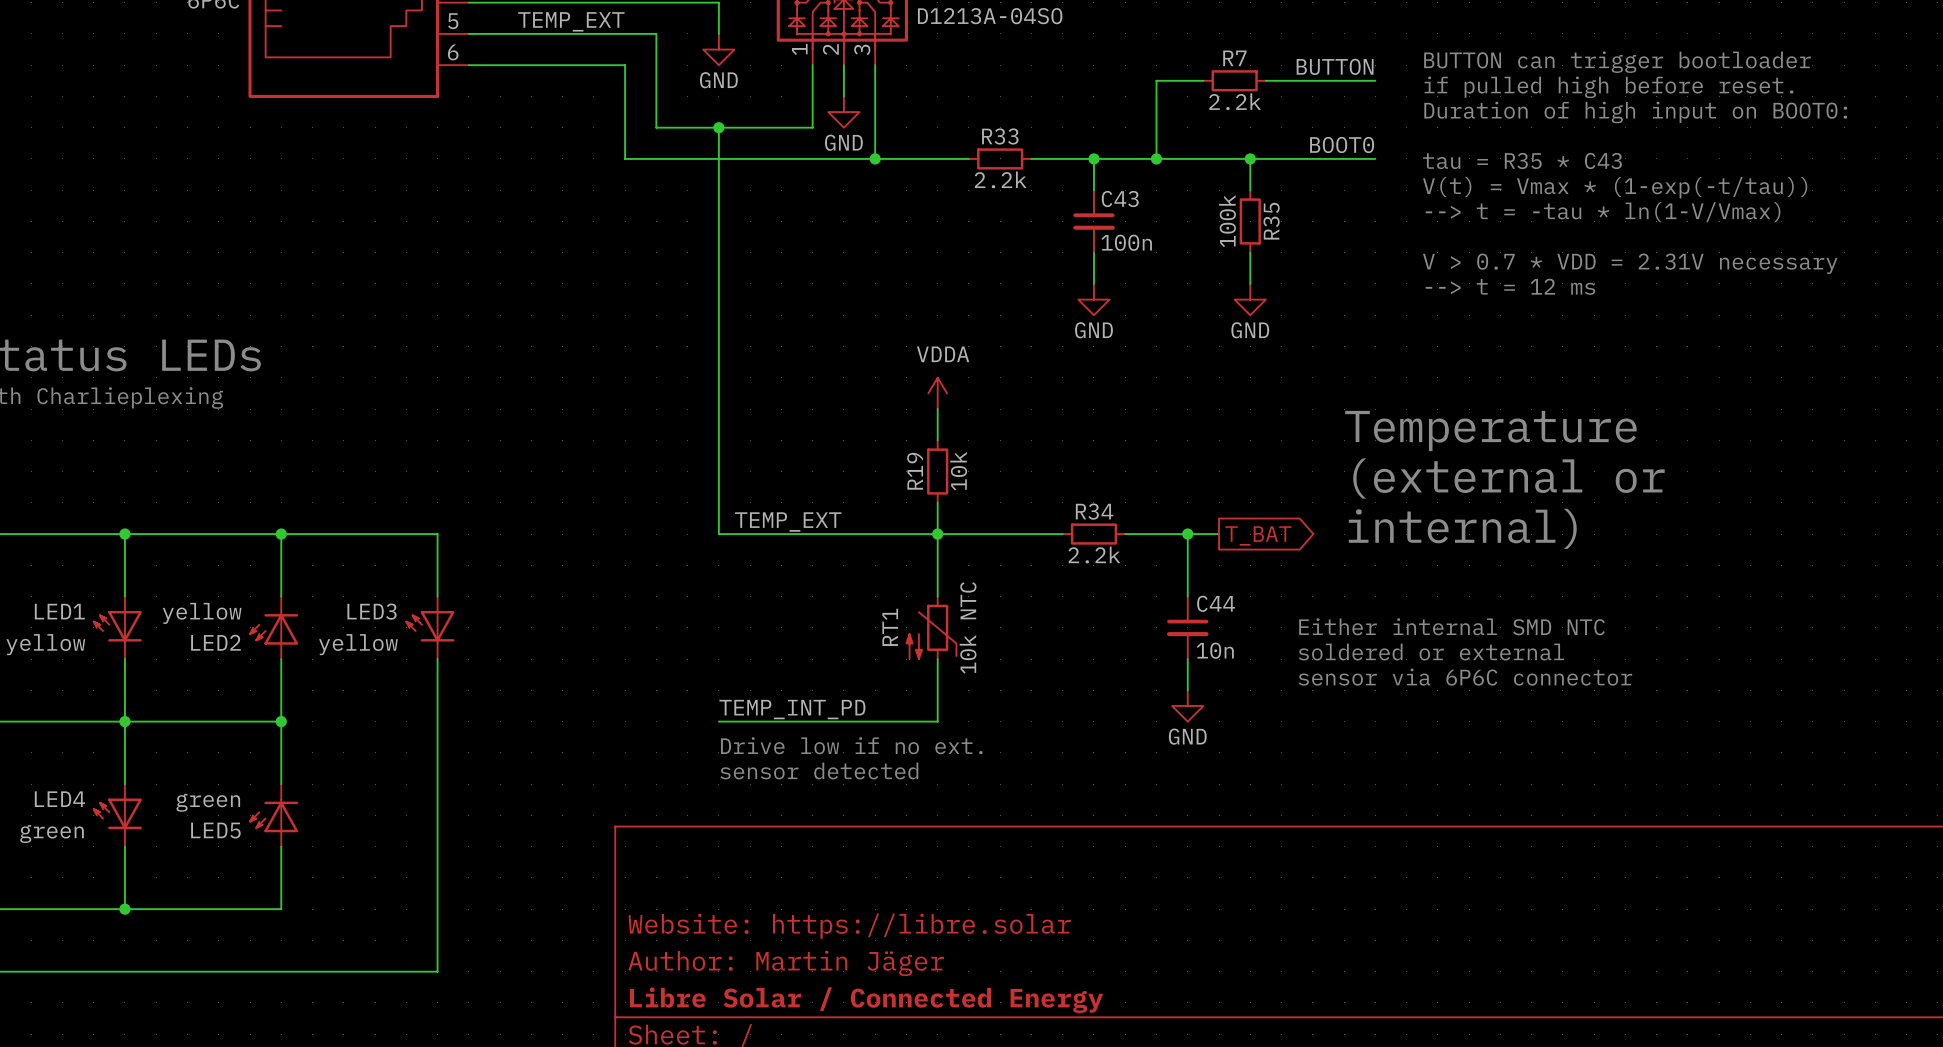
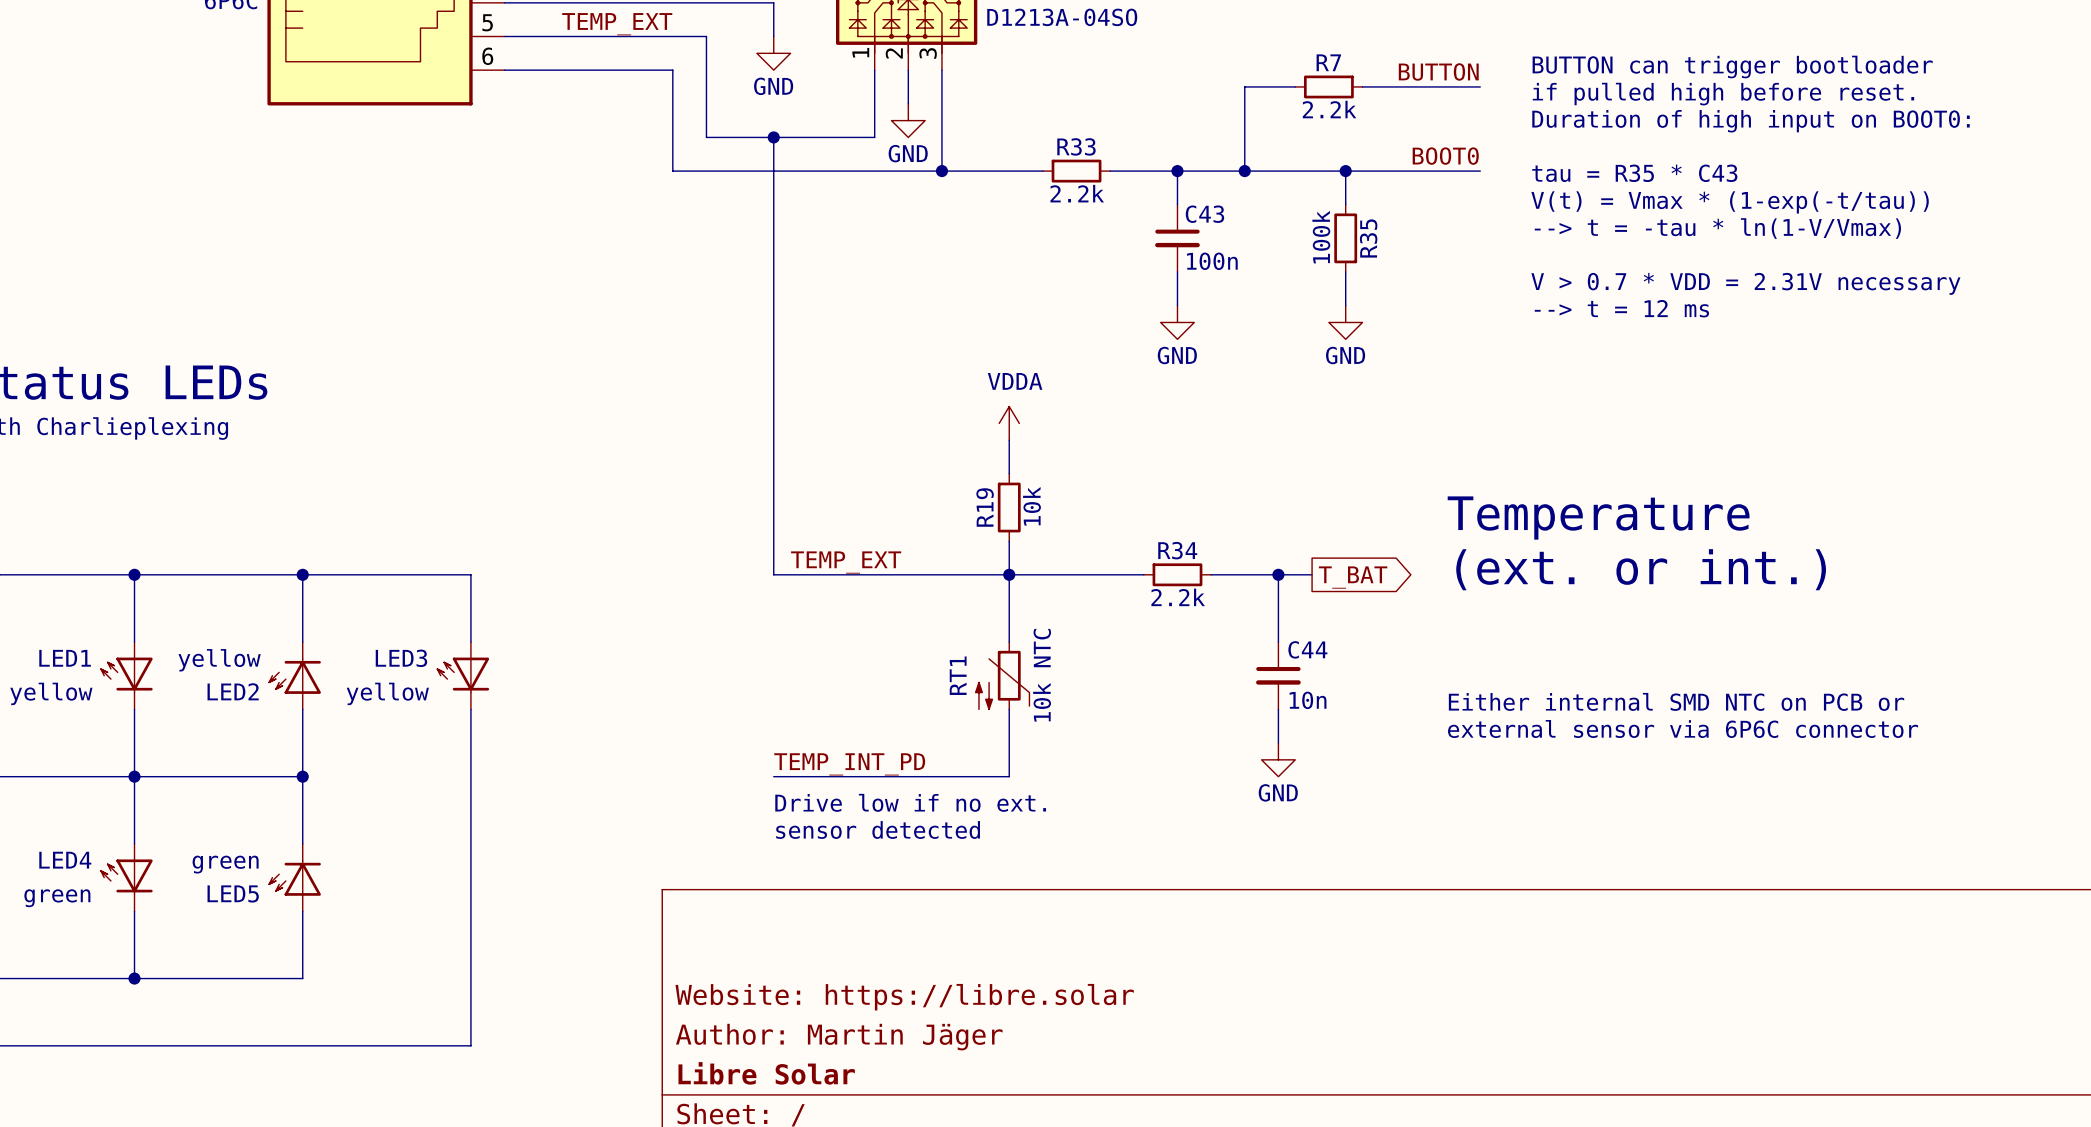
text: Temperature (1490, 430) -> none
text: (external or (1508, 478) -> Temperature (1598, 518)
text: internal) (1462, 528) -> (ext. or int.) (1641, 569)
text: Either internal SMD NTC (1451, 626) -> Either internal SMD NTC on PCB or (1676, 701)
text: soldered or external (1431, 652) -> none
text: sensor via 6P6C connector (1465, 677) -> external sensor via 6P6C connector (1683, 729)
title block: Libre Solar / Connected Energy (866, 1000) -> Libre Solar (766, 1073)

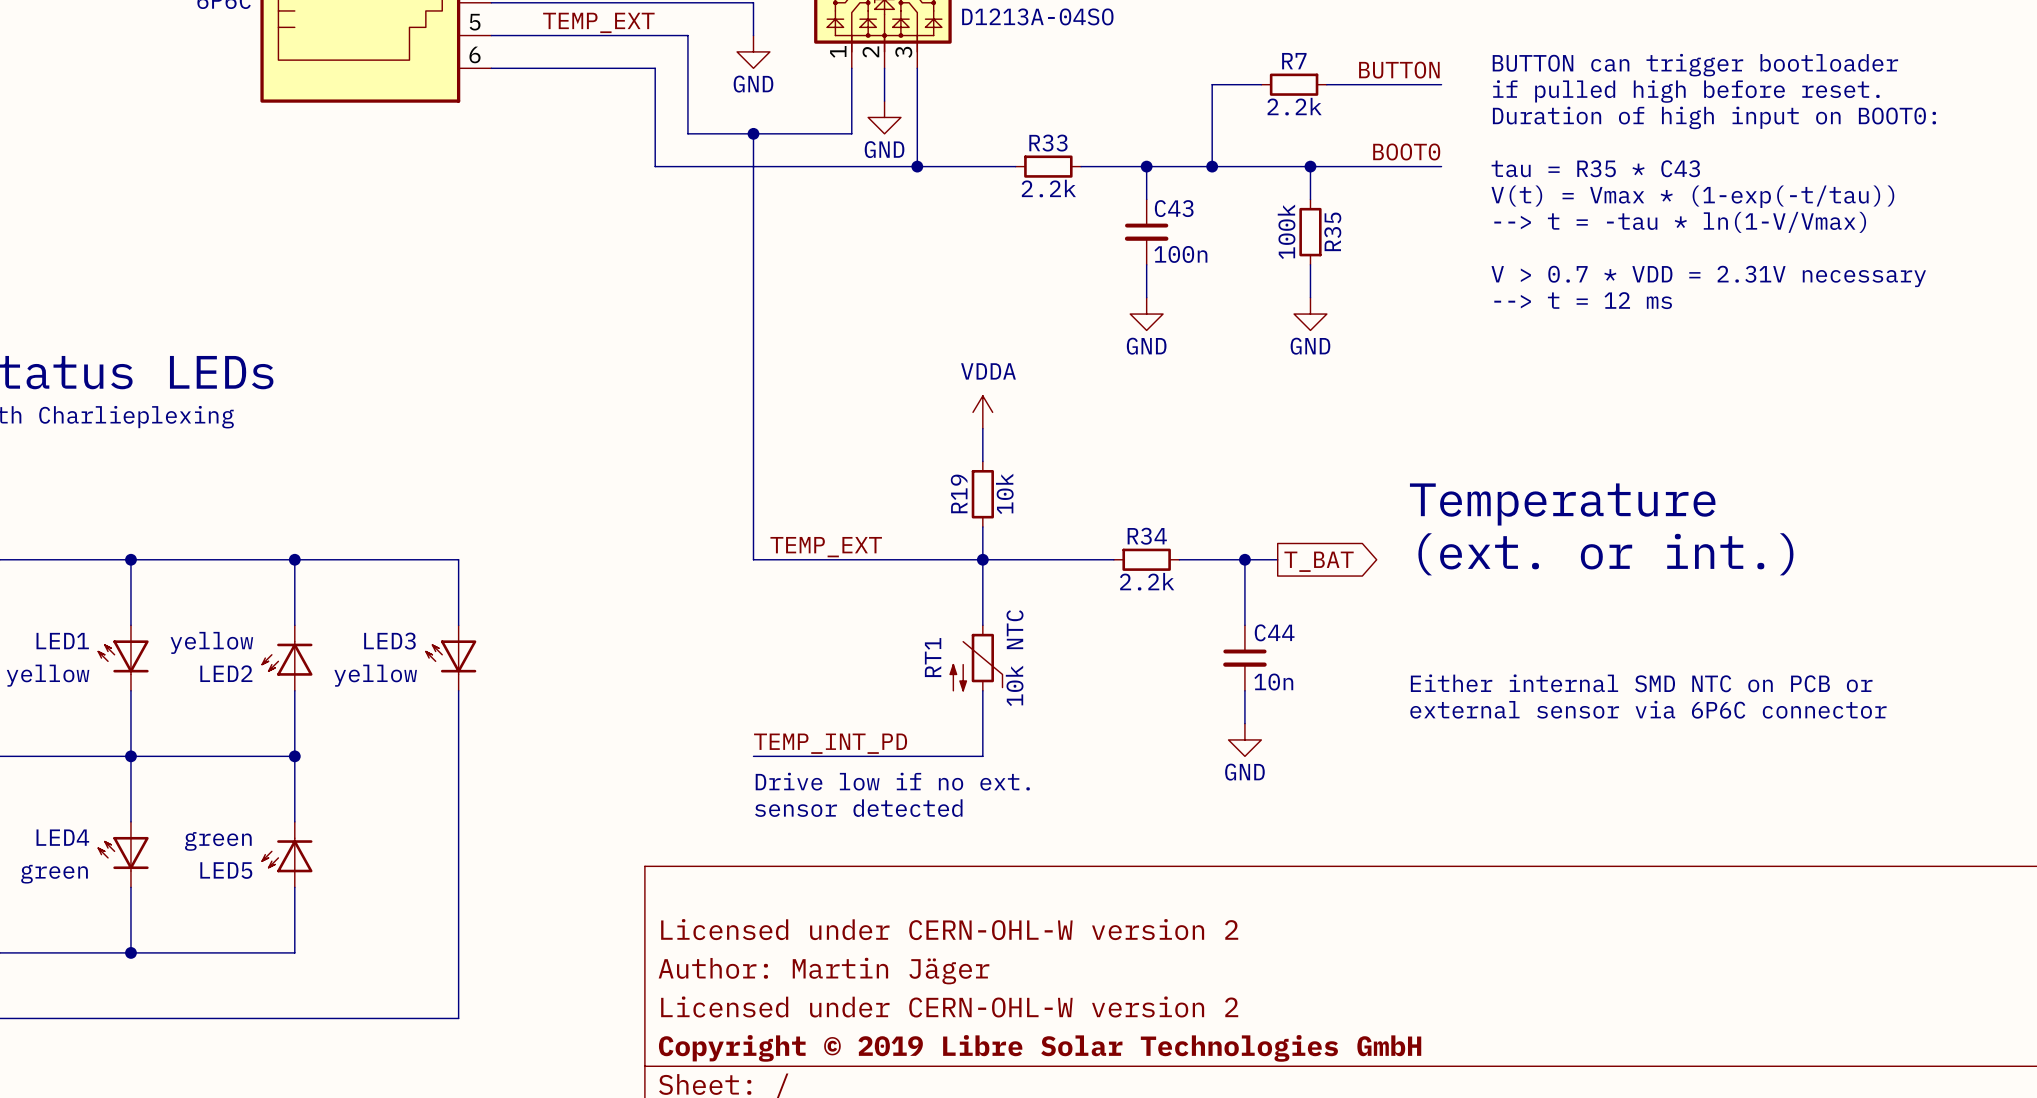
title block: none -> Licensed under CERN-OHL-W version 2 (949, 929)
title block: Website: https://libre.solar (904, 997) -> Author: Martin Jäger (824, 971)
title block: Author: Martin Jäger (839, 1037) -> Licensed under CERN-OHL-W version 2 (949, 1006)
title block: Libre Solar (766, 1073) -> Copyright © 2019 Libre Solar Technologies GmbH (1040, 1048)

